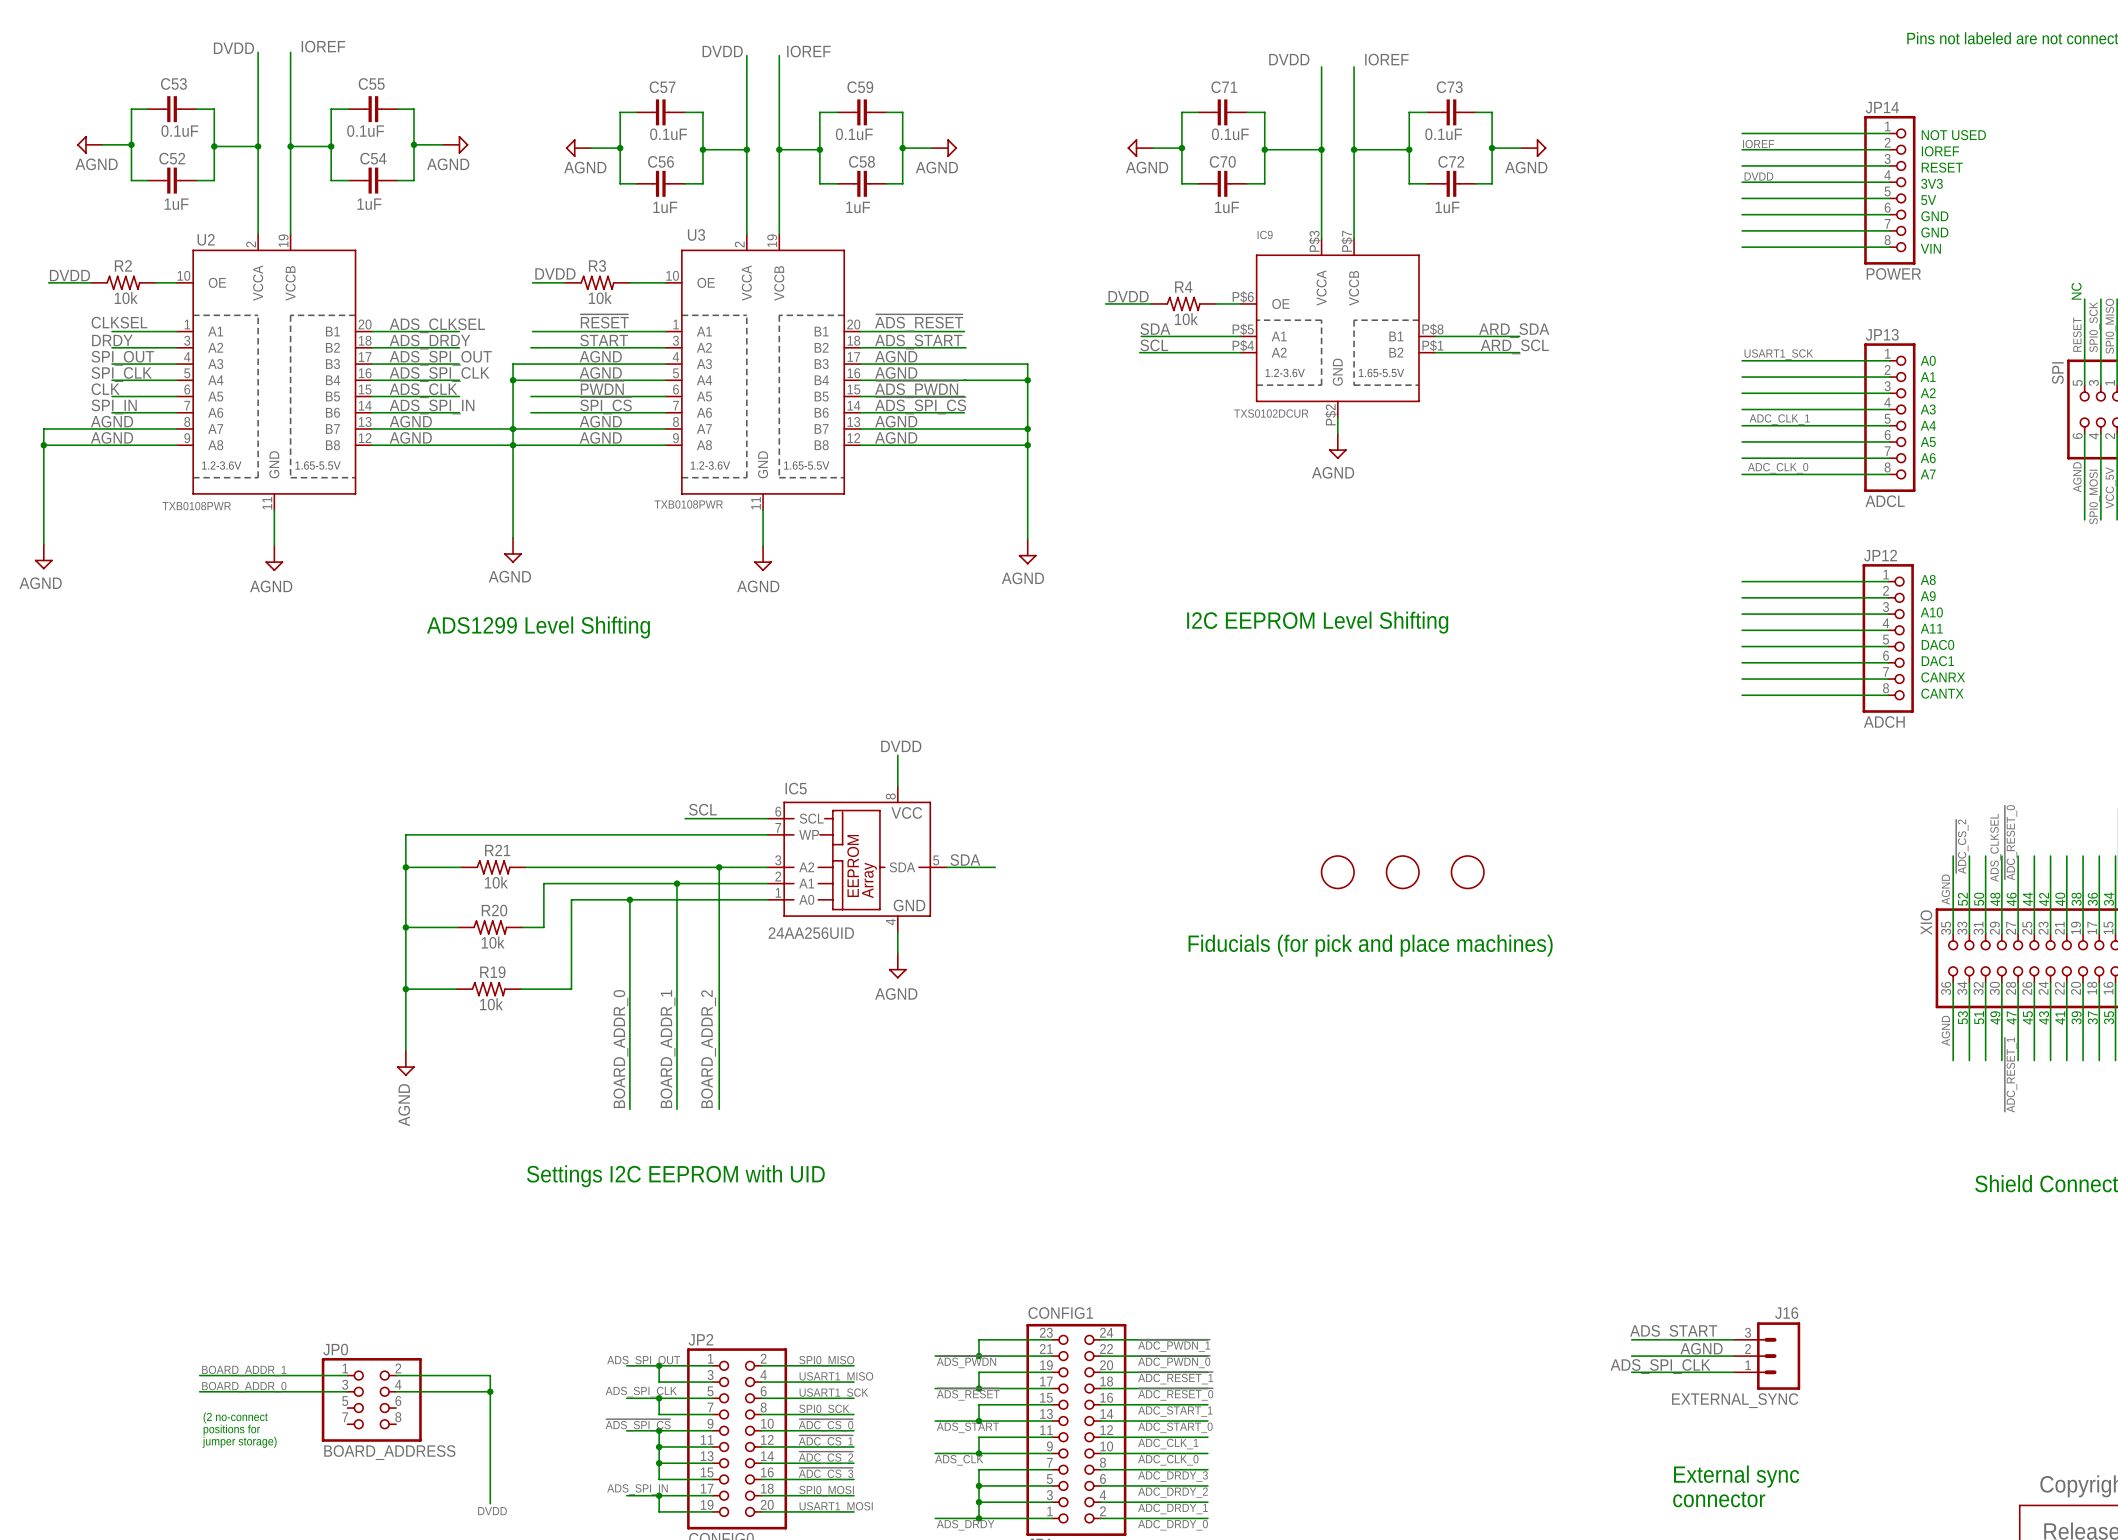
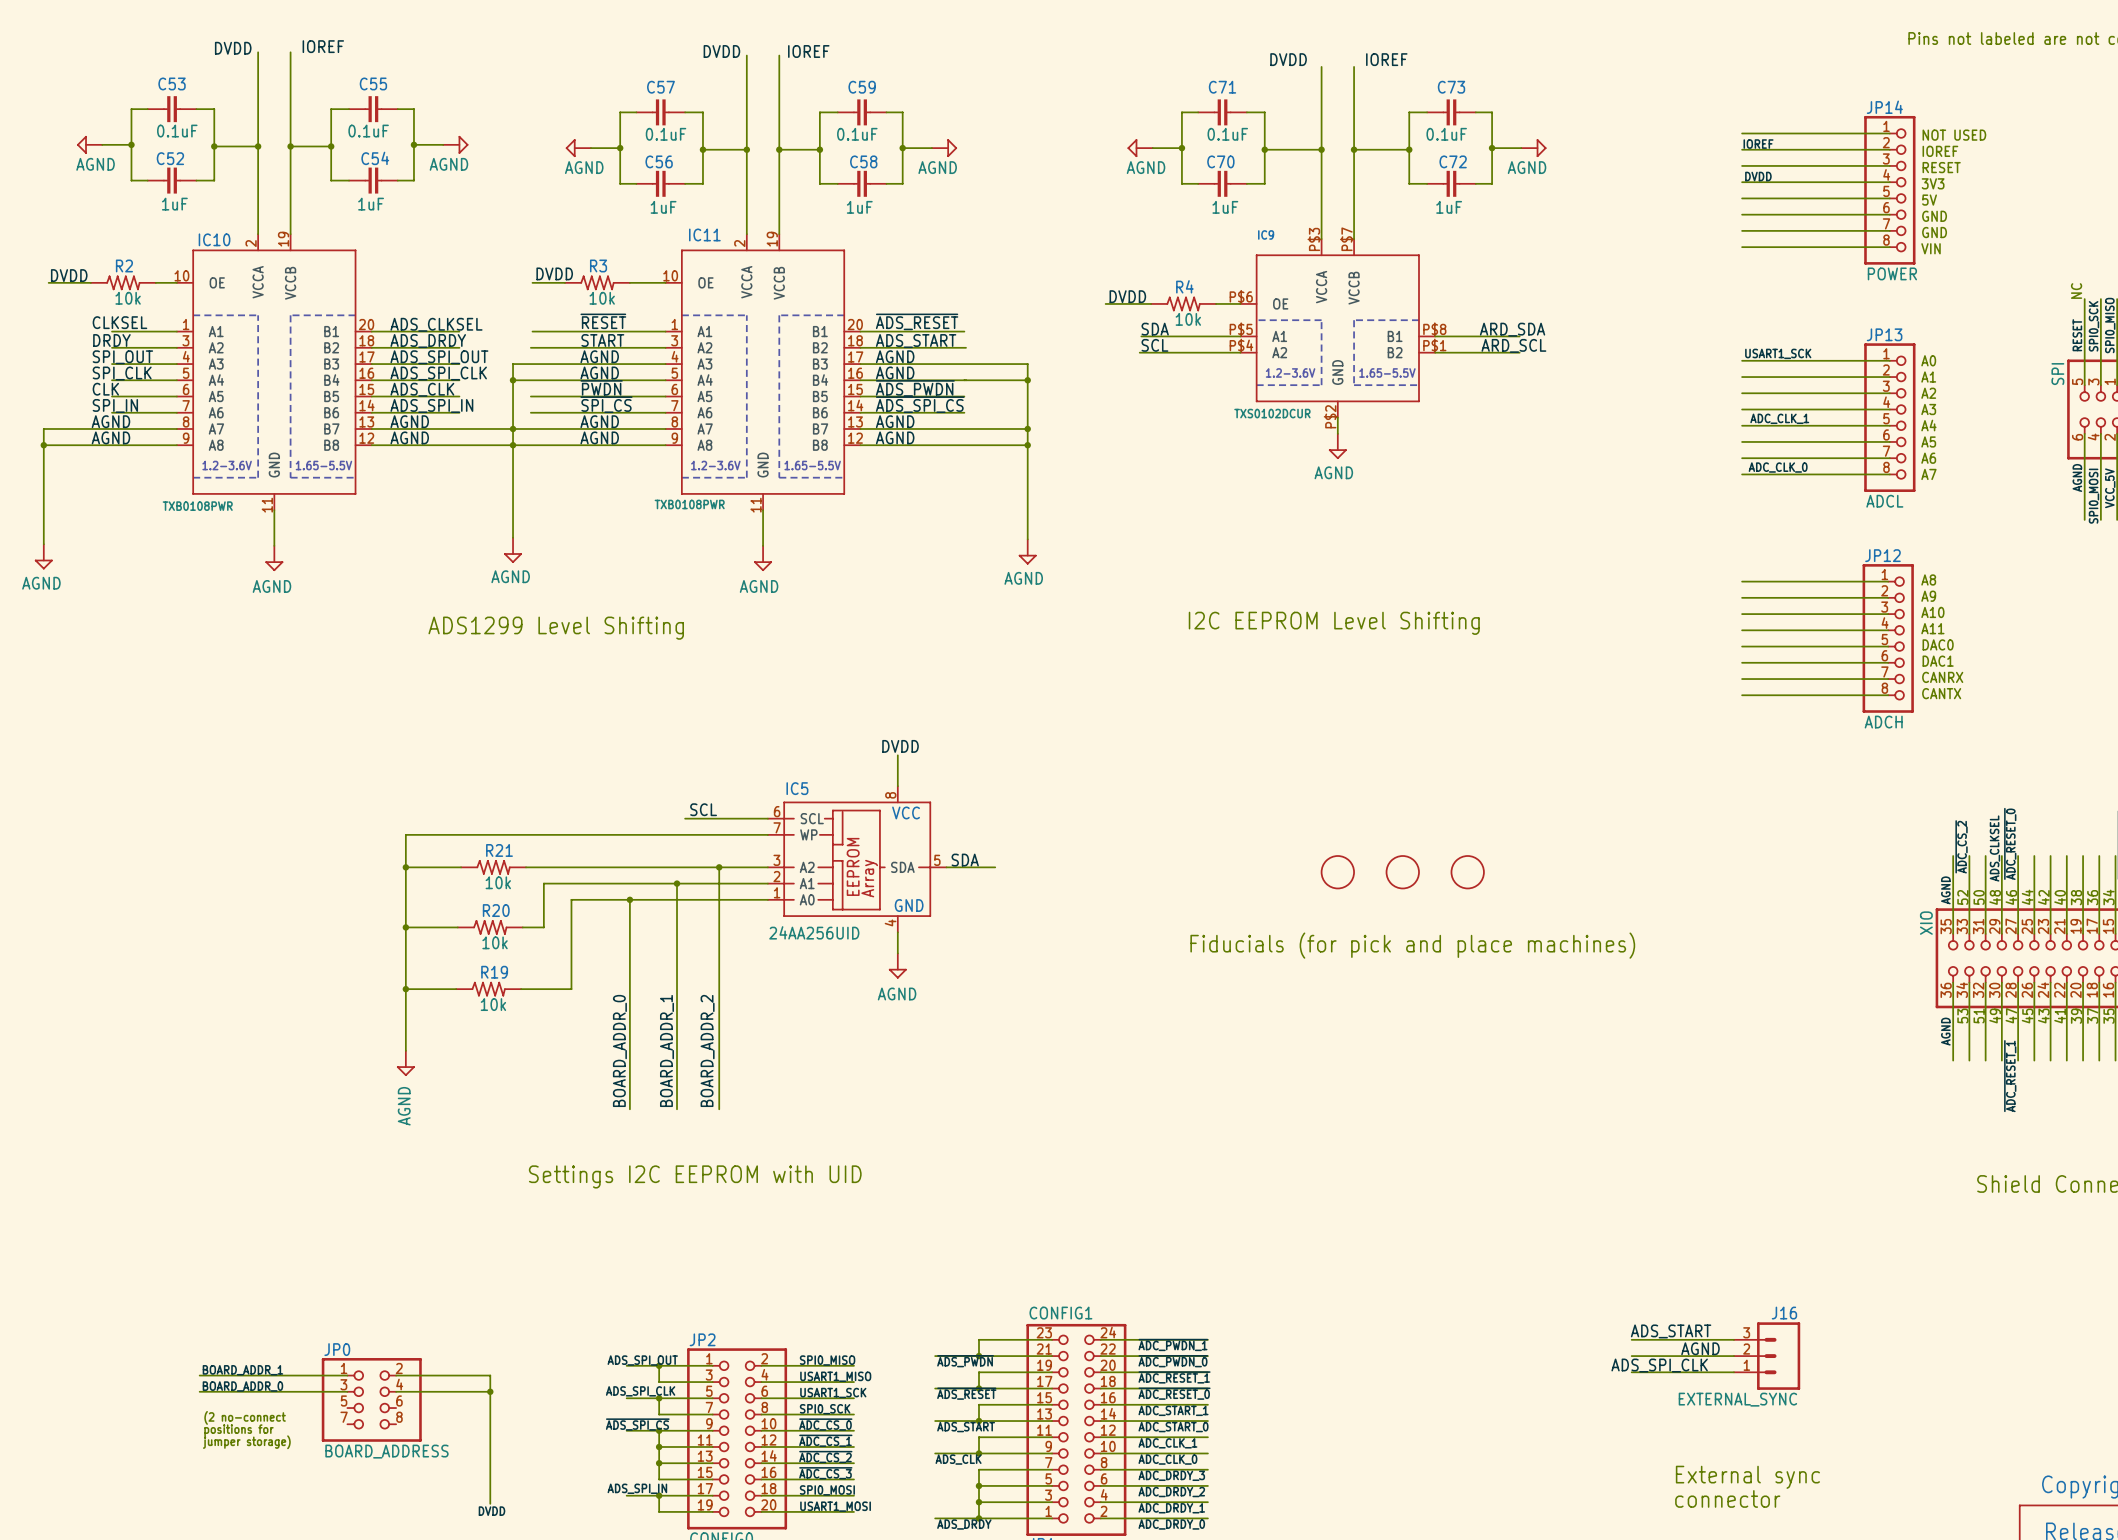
U3 name: U3 (696, 234) -> IC11 (704, 234)
U2 name: U2 (206, 239) -> IC10 (214, 239)

